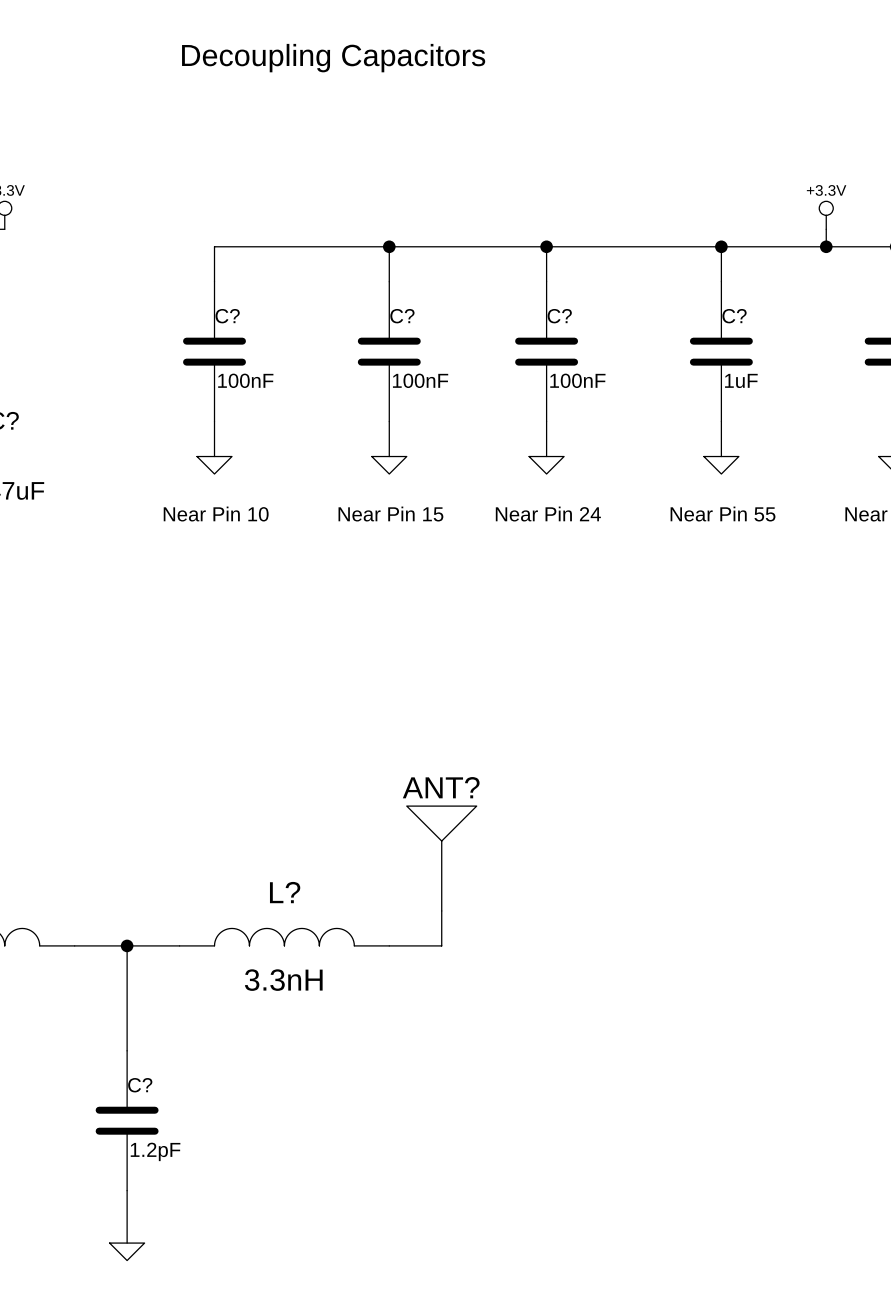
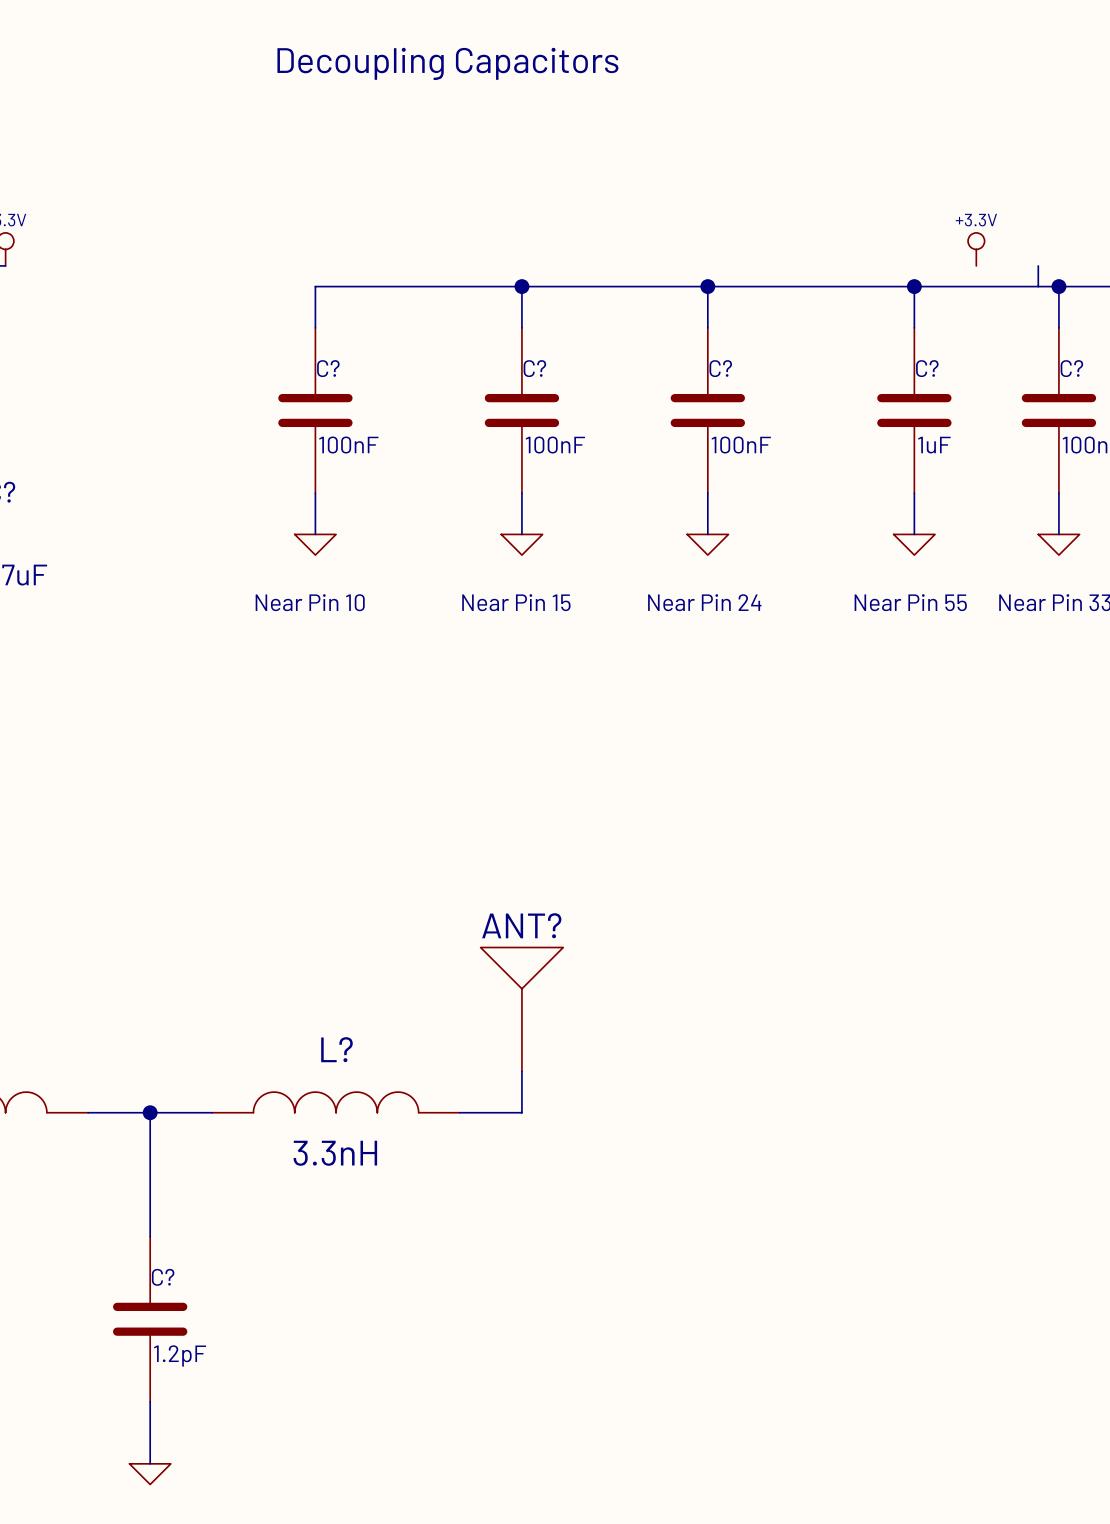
text position: Decoupling Capacitors (333, 58) -> Decoupling Capacitors (447, 63)
wire: (826, 229) (826, 246) -> (1038, 265) (1038, 286)
wire: (266, 246) (214, 246) (214, 281) -> (315, 286) (315, 327)
wire: (389, 246) (389, 281) -> (521, 286) (521, 327)
junction: (389, 246) -> none
junction: none -> (521, 286)
wire: (546, 246) (546, 281) -> (707, 286) (707, 327)
junction: (546, 246) -> none
junction: none -> (707, 286)
wire: (721, 246) (721, 281) -> (914, 286) (914, 327)
junction: (721, 246) -> none
junction: none -> (914, 286)
junction: (826, 246) -> none
C? position: (214, 351) -> (315, 410)
C?: 100nF (389, 351) -> none
C?: none -> 100nF (521, 410)
C?: 100nF (546, 351) -> none
C?: none -> 100nF (707, 410)
C? position: (721, 351) -> (914, 410)
wire: (214, 421) (214, 456) -> (315, 493) (315, 534)
wire: (389, 421) (389, 456) -> (521, 493) (521, 534)
wire: (546, 421) (546, 456) -> (707, 493) (707, 534)
wire: (721, 421) (721, 456) -> (914, 493) (914, 534)
power symbol position: (214, 465) -> (315, 544)
power symbol: (389, 465) -> none
power symbol: none -> (521, 544)
power symbol: (546, 465) -> none
power symbol: none -> (707, 544)
power symbol position: (721, 465) -> (914, 544)
text position: Near Pin 10 (216, 514) -> Near Pin 10 (310, 602)
text position: Near Pin 15 (390, 514) -> Near Pin 15 (516, 602)
text position: Near Pin 24 (548, 514) -> Near Pin 24 (704, 602)
text position: Near Pin 55 (723, 514) -> Near Pin 55 (910, 602)

